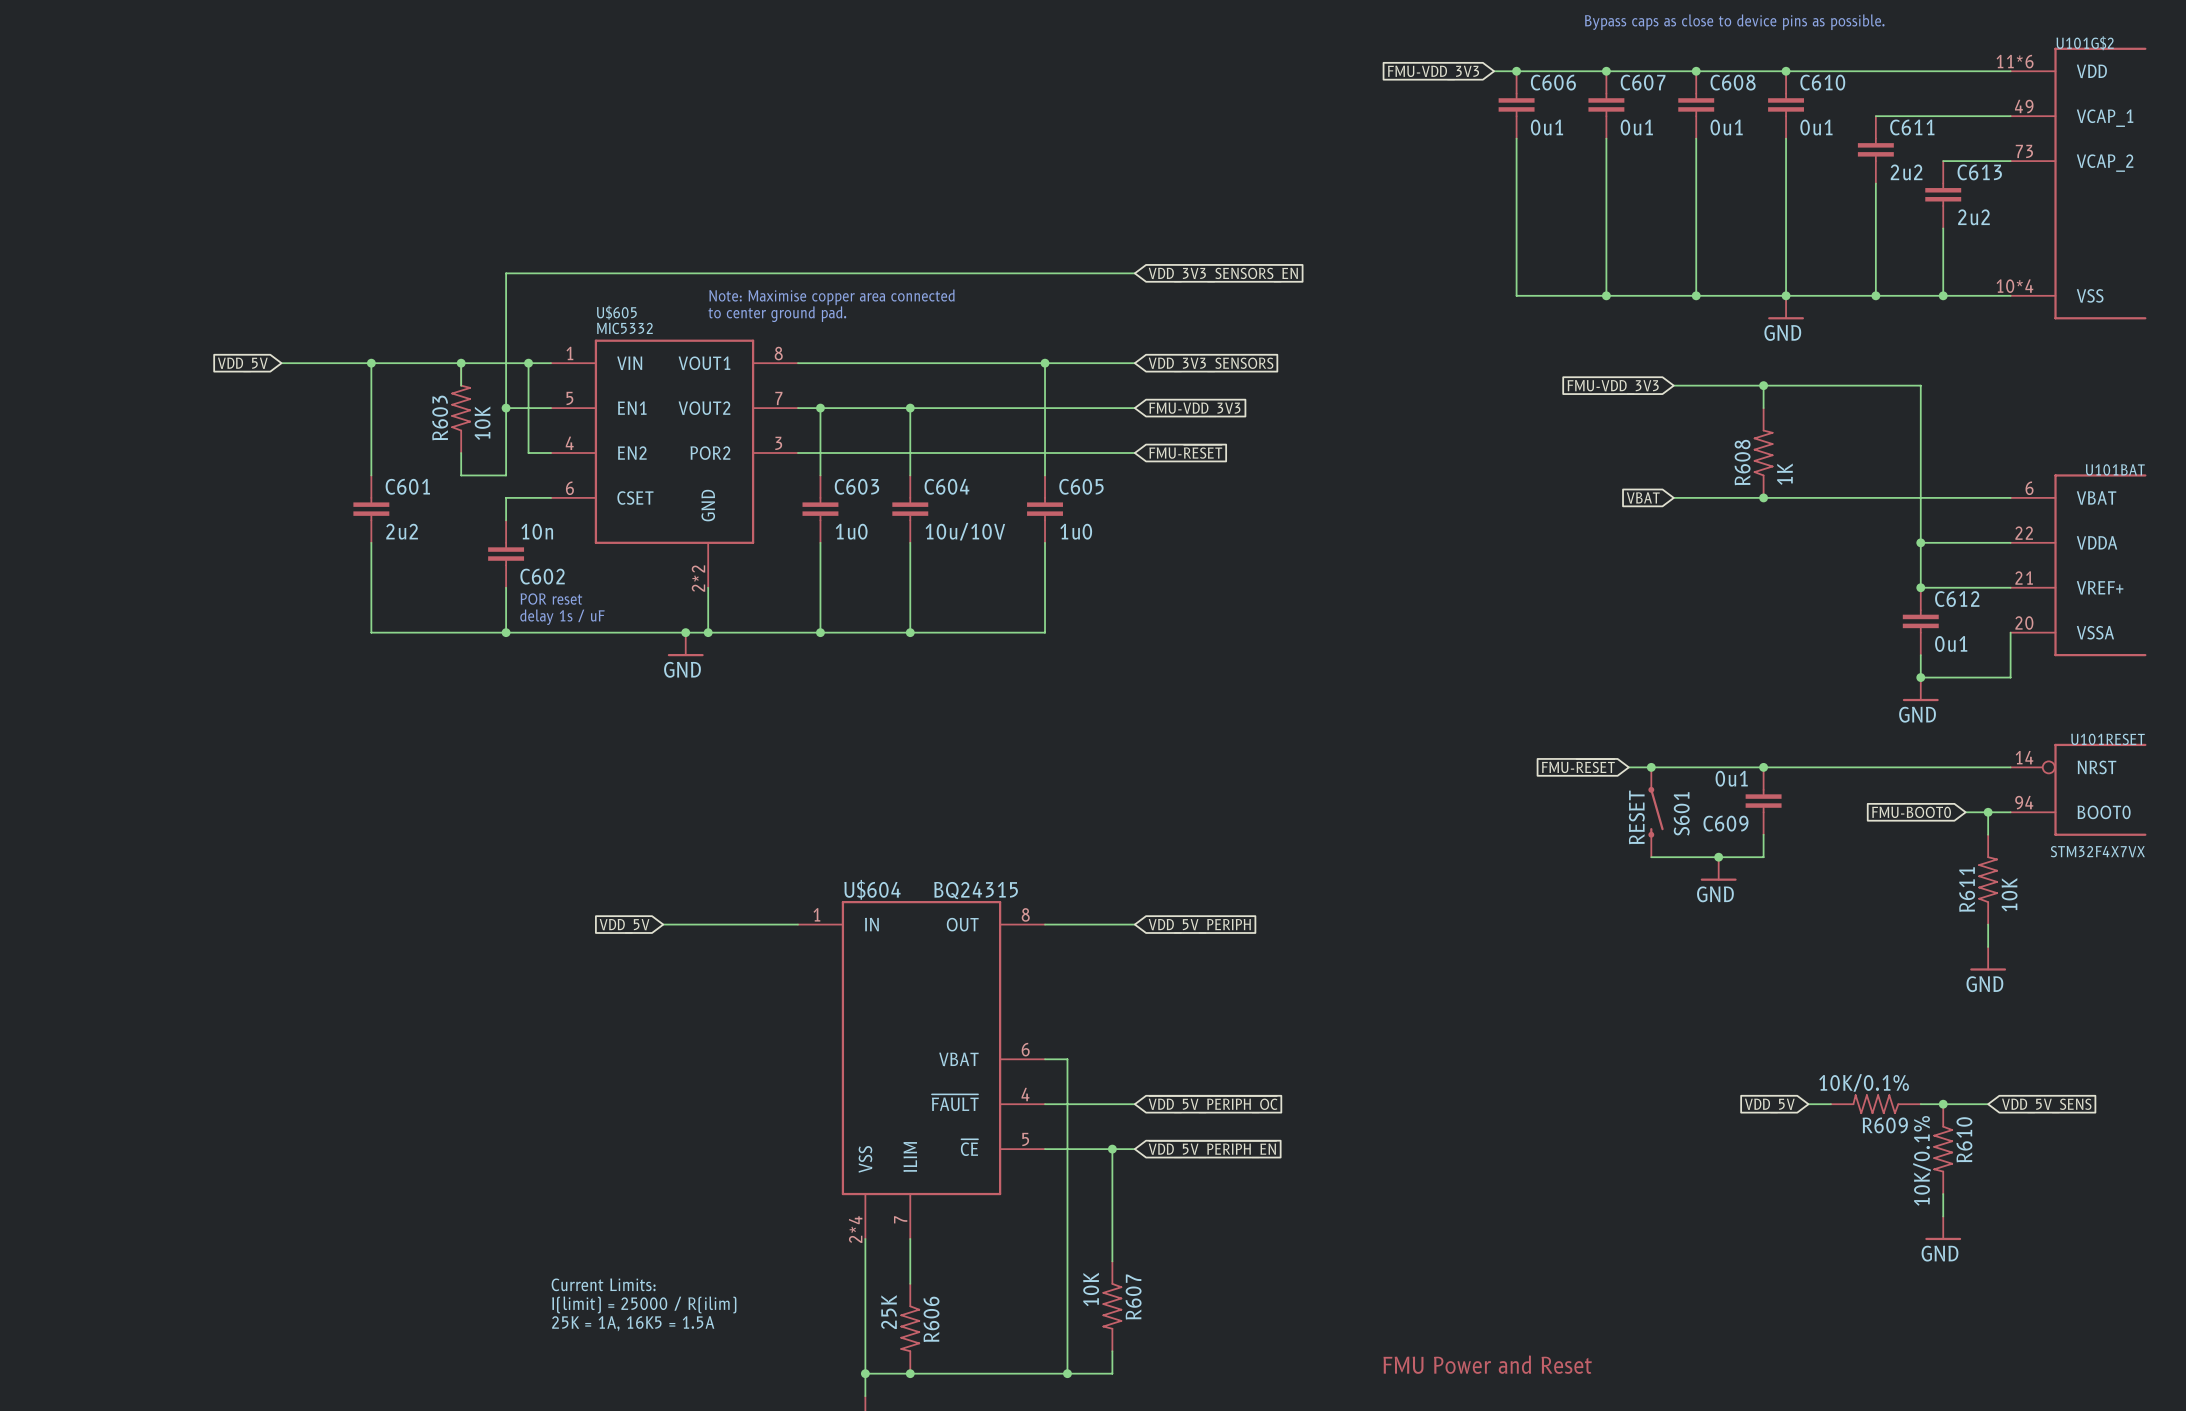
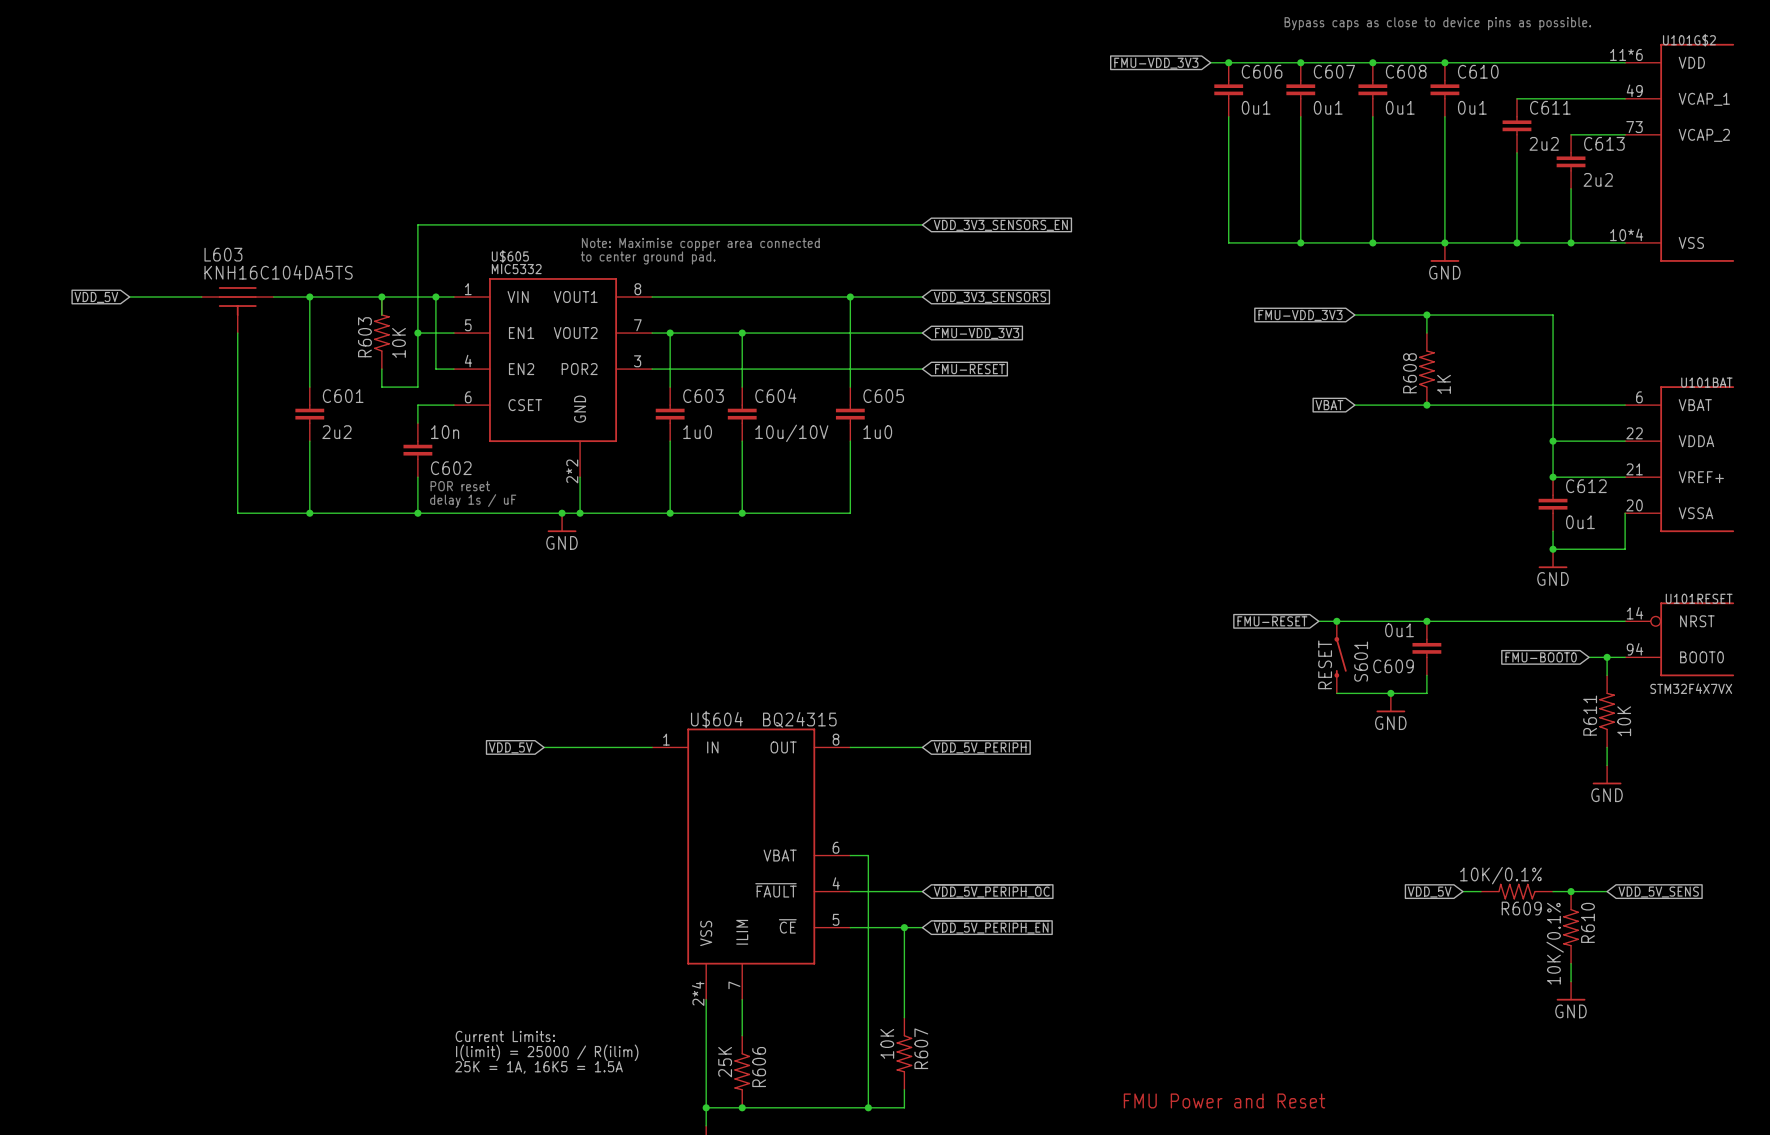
wire: none -> (129, 297) (201, 297)
global label position: VDD_5V (242, 364) -> VDD_5V (96, 297)
L603: none -> KNH16C104DA5TS (237, 310)
wire: none -> (237, 333) (237, 513) (309, 513)
junction: none -> (309, 513)

